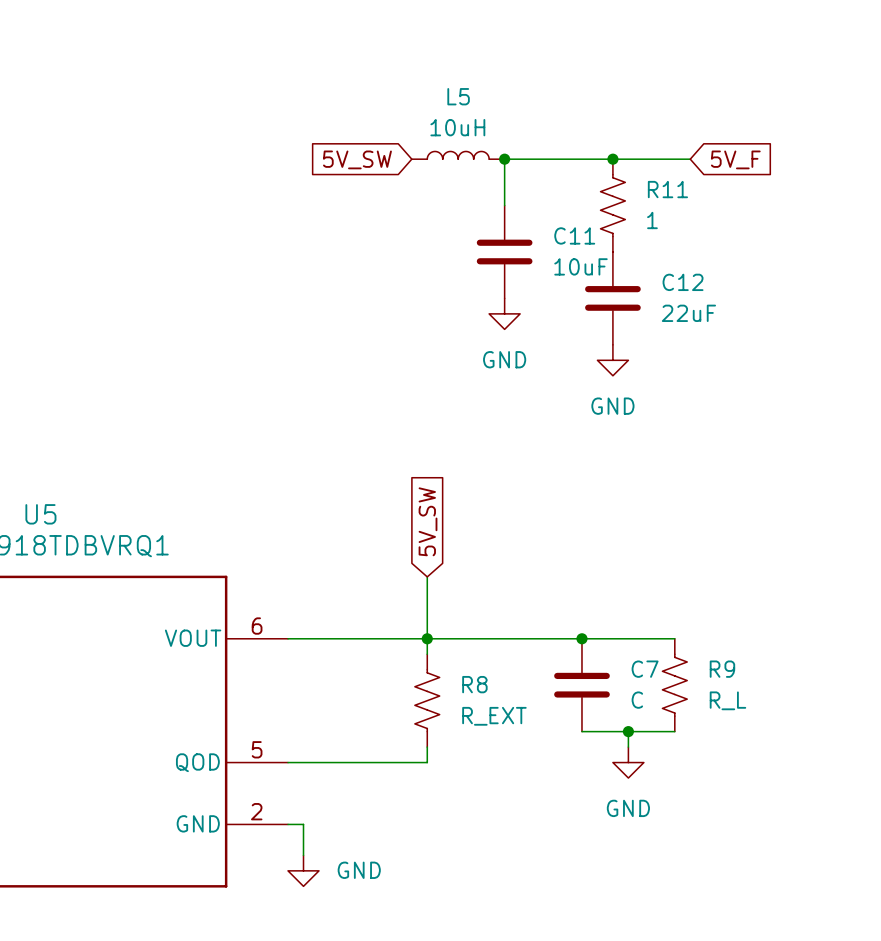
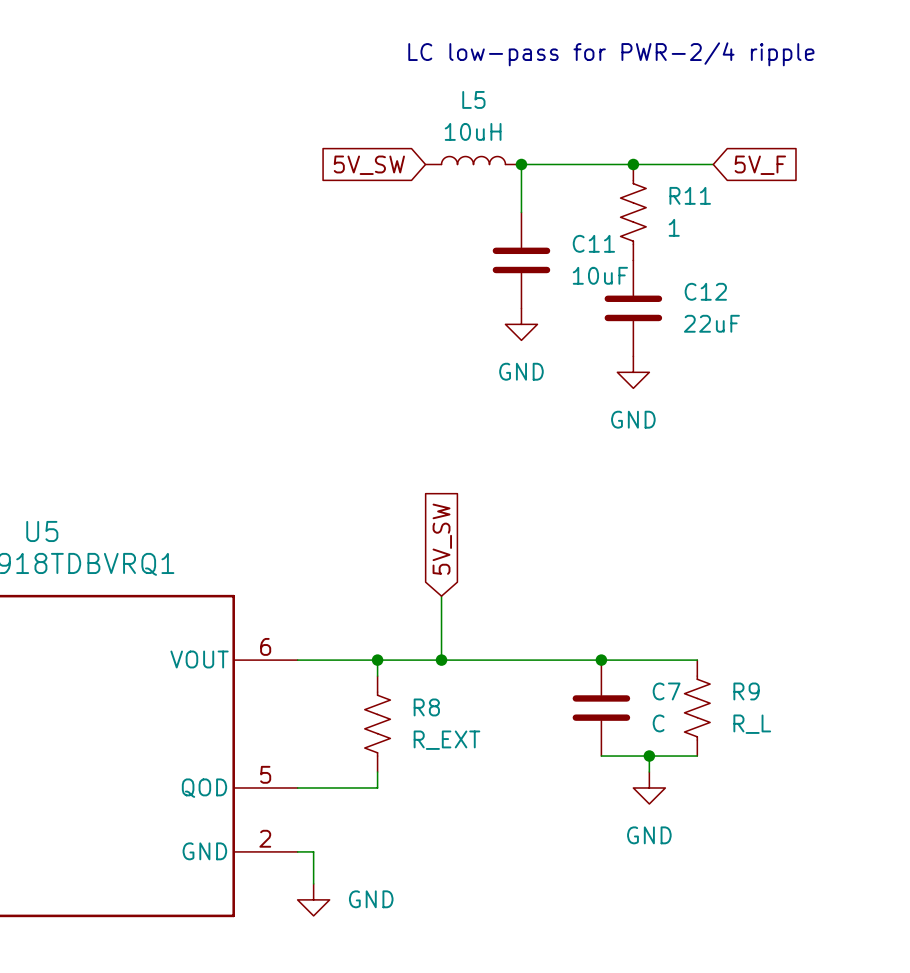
text: none -> LC low-pass for PWR-2/4 ripple (611, 54)
junction: none -> (377, 660)
wire: (427, 638) (427, 654) -> (377, 660) (377, 676)
R8 position: (427, 700) -> (377, 724)
wire: (427, 747) (427, 762) (365, 762) -> (377, 772) (377, 787)

